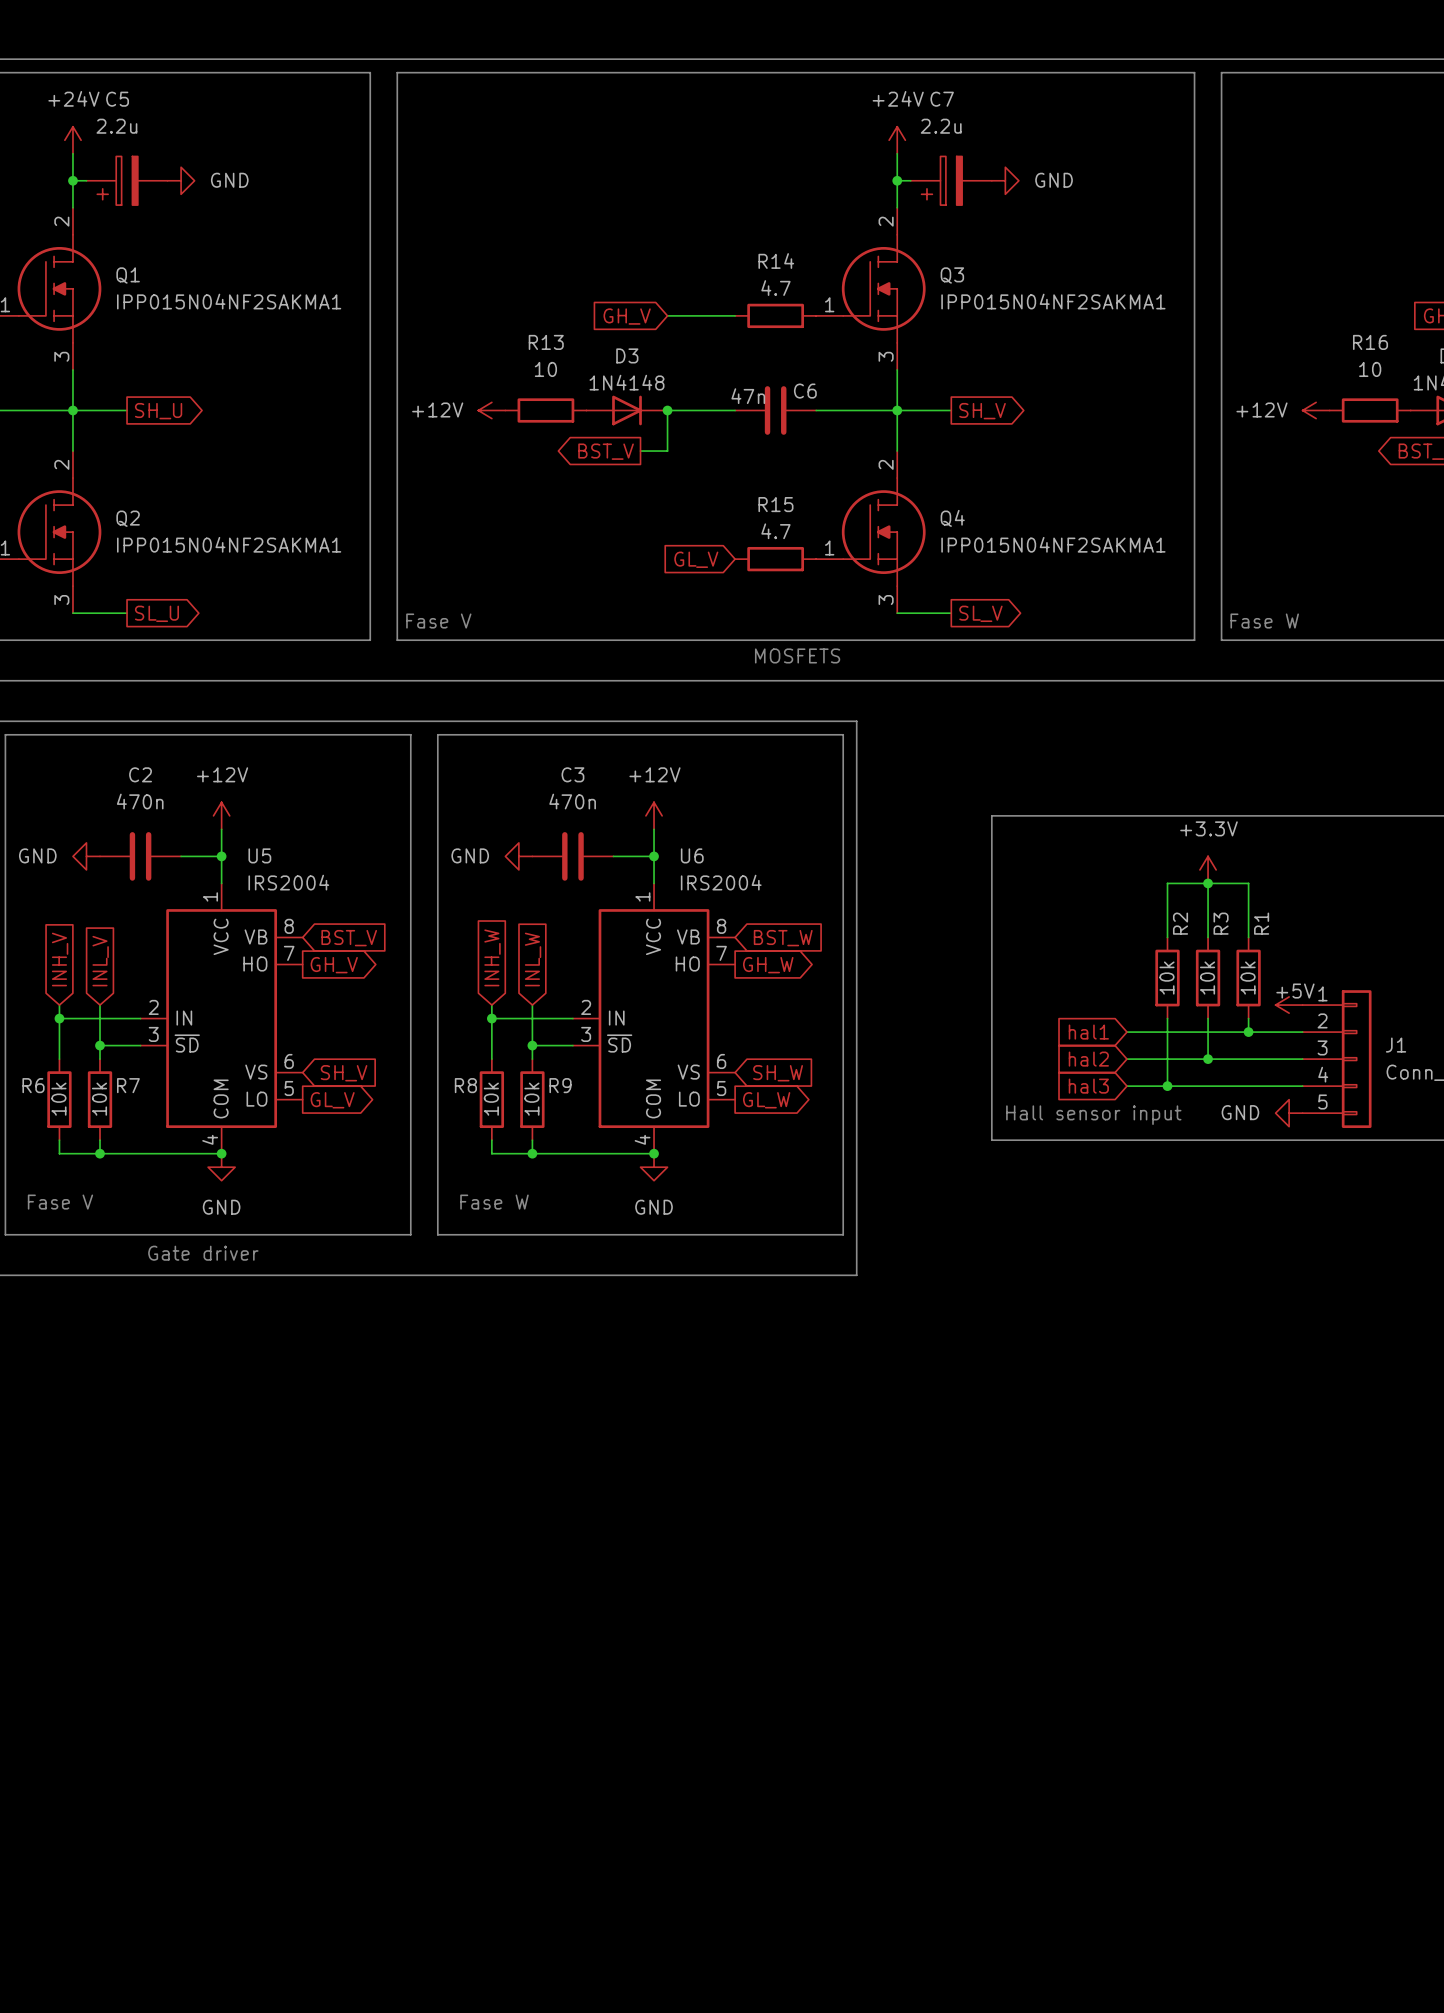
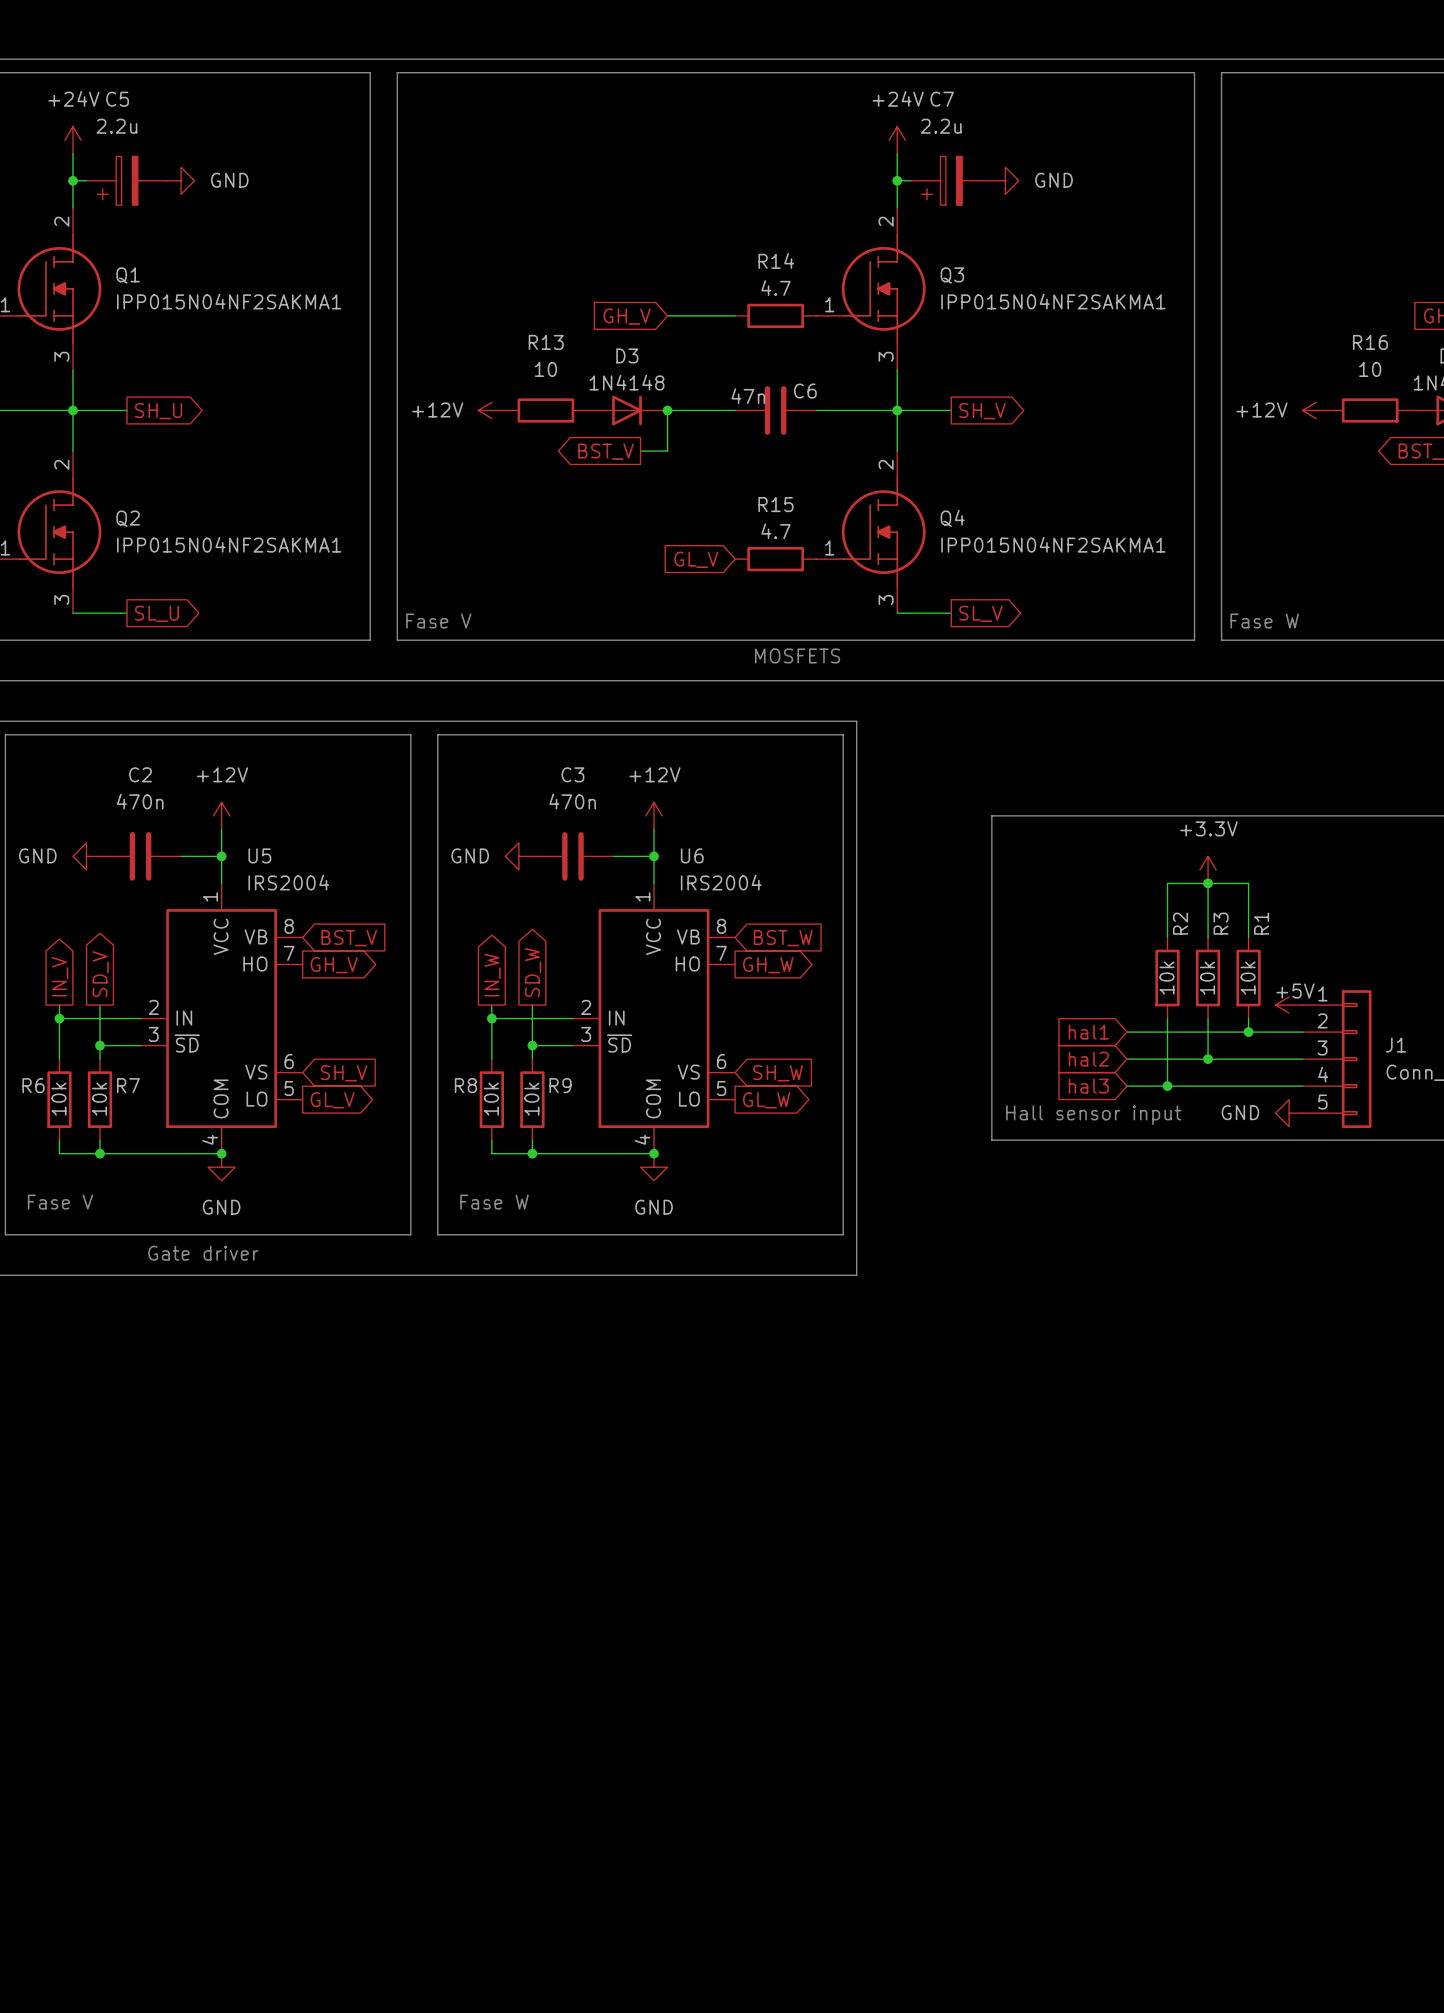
global label shape: input (492, 957) -> output (492, 975)
global label: INH_W (492, 957) -> IN_W (492, 975)
global label shape: input (60, 959) -> output (60, 976)
global label: INH_V (60, 959) -> IN_V (60, 976)
global label shape: input (533, 959) -> output (533, 972)
global label: INL_W (533, 959) -> SD_W (533, 972)
global label shape: input (100, 961) -> output (100, 974)
global label: INL_V (100, 961) -> SD_V (100, 974)

